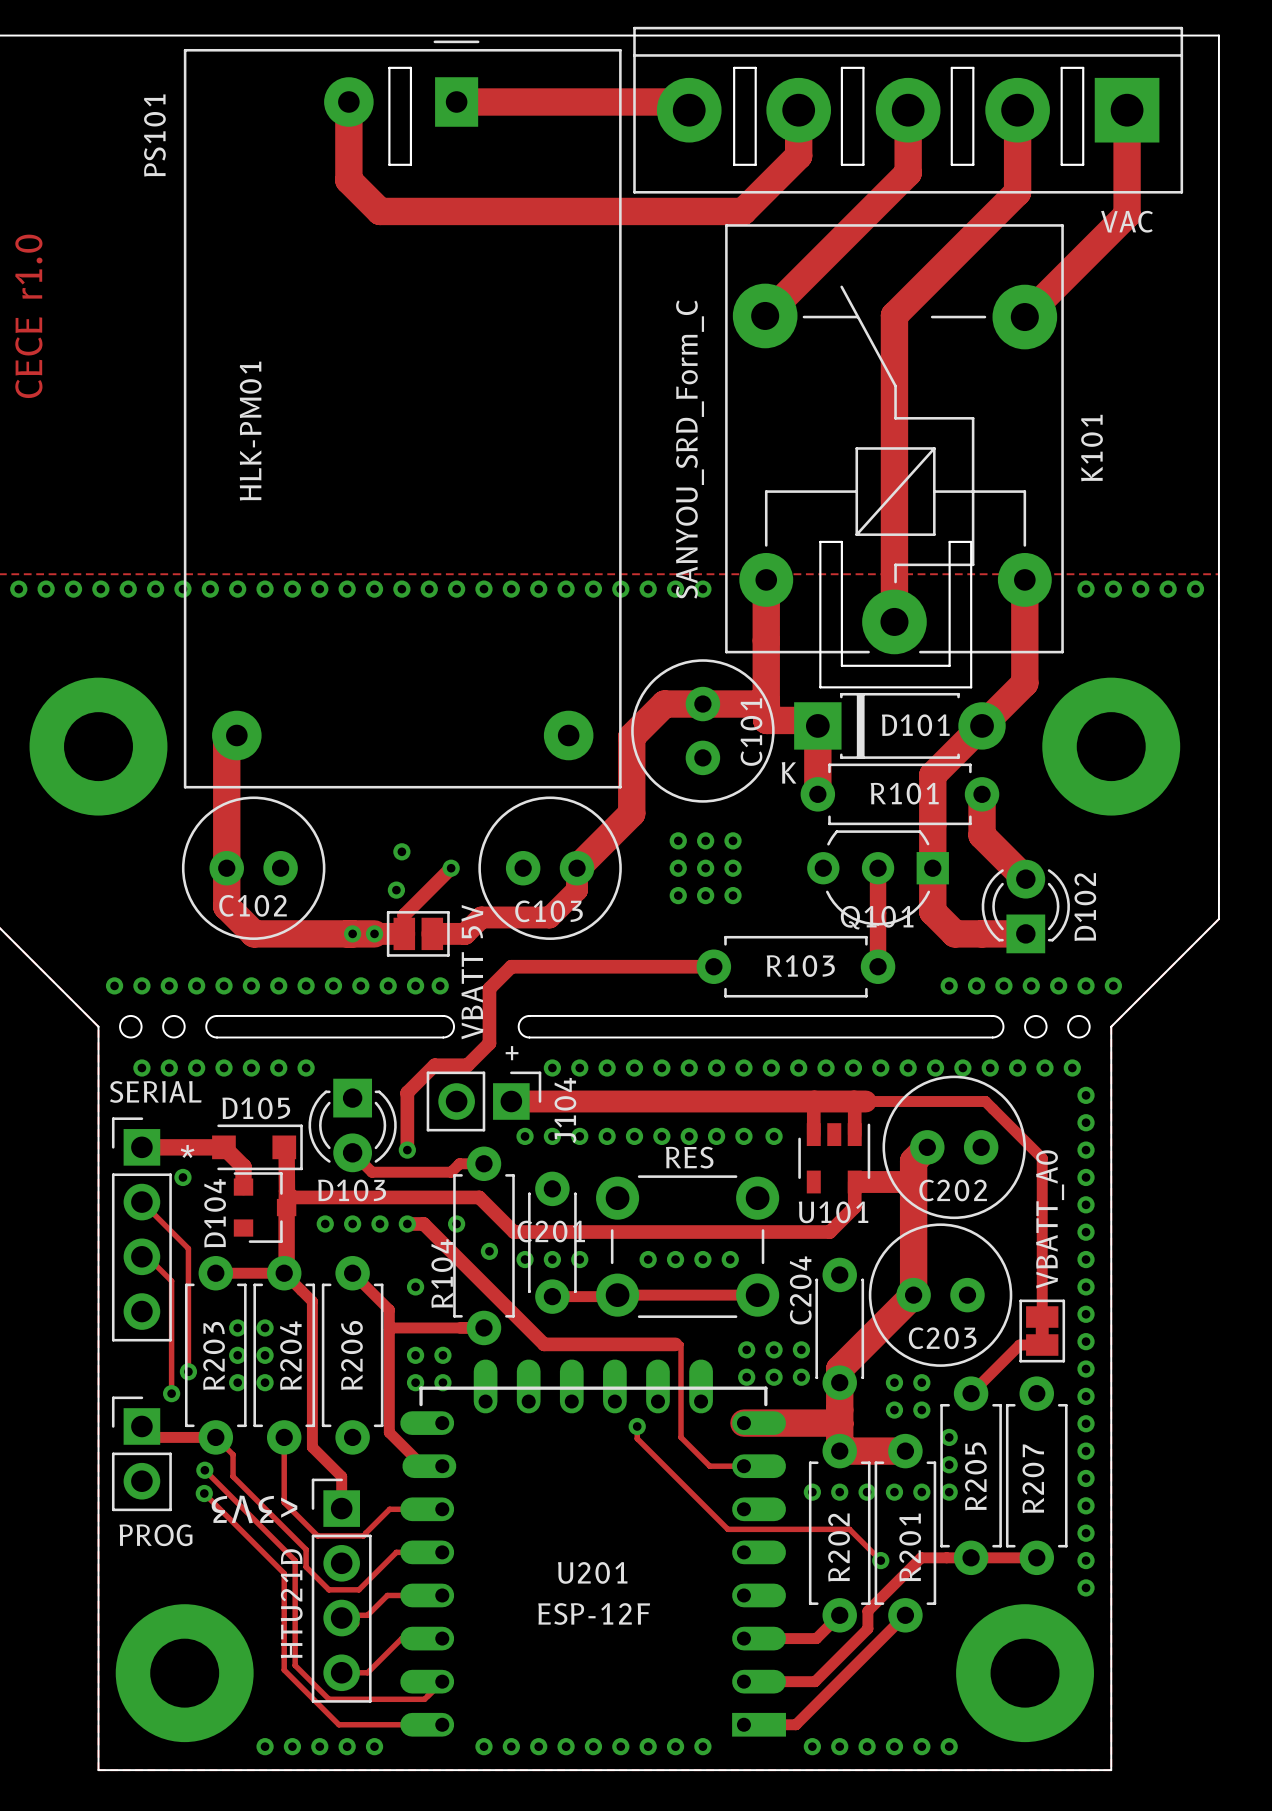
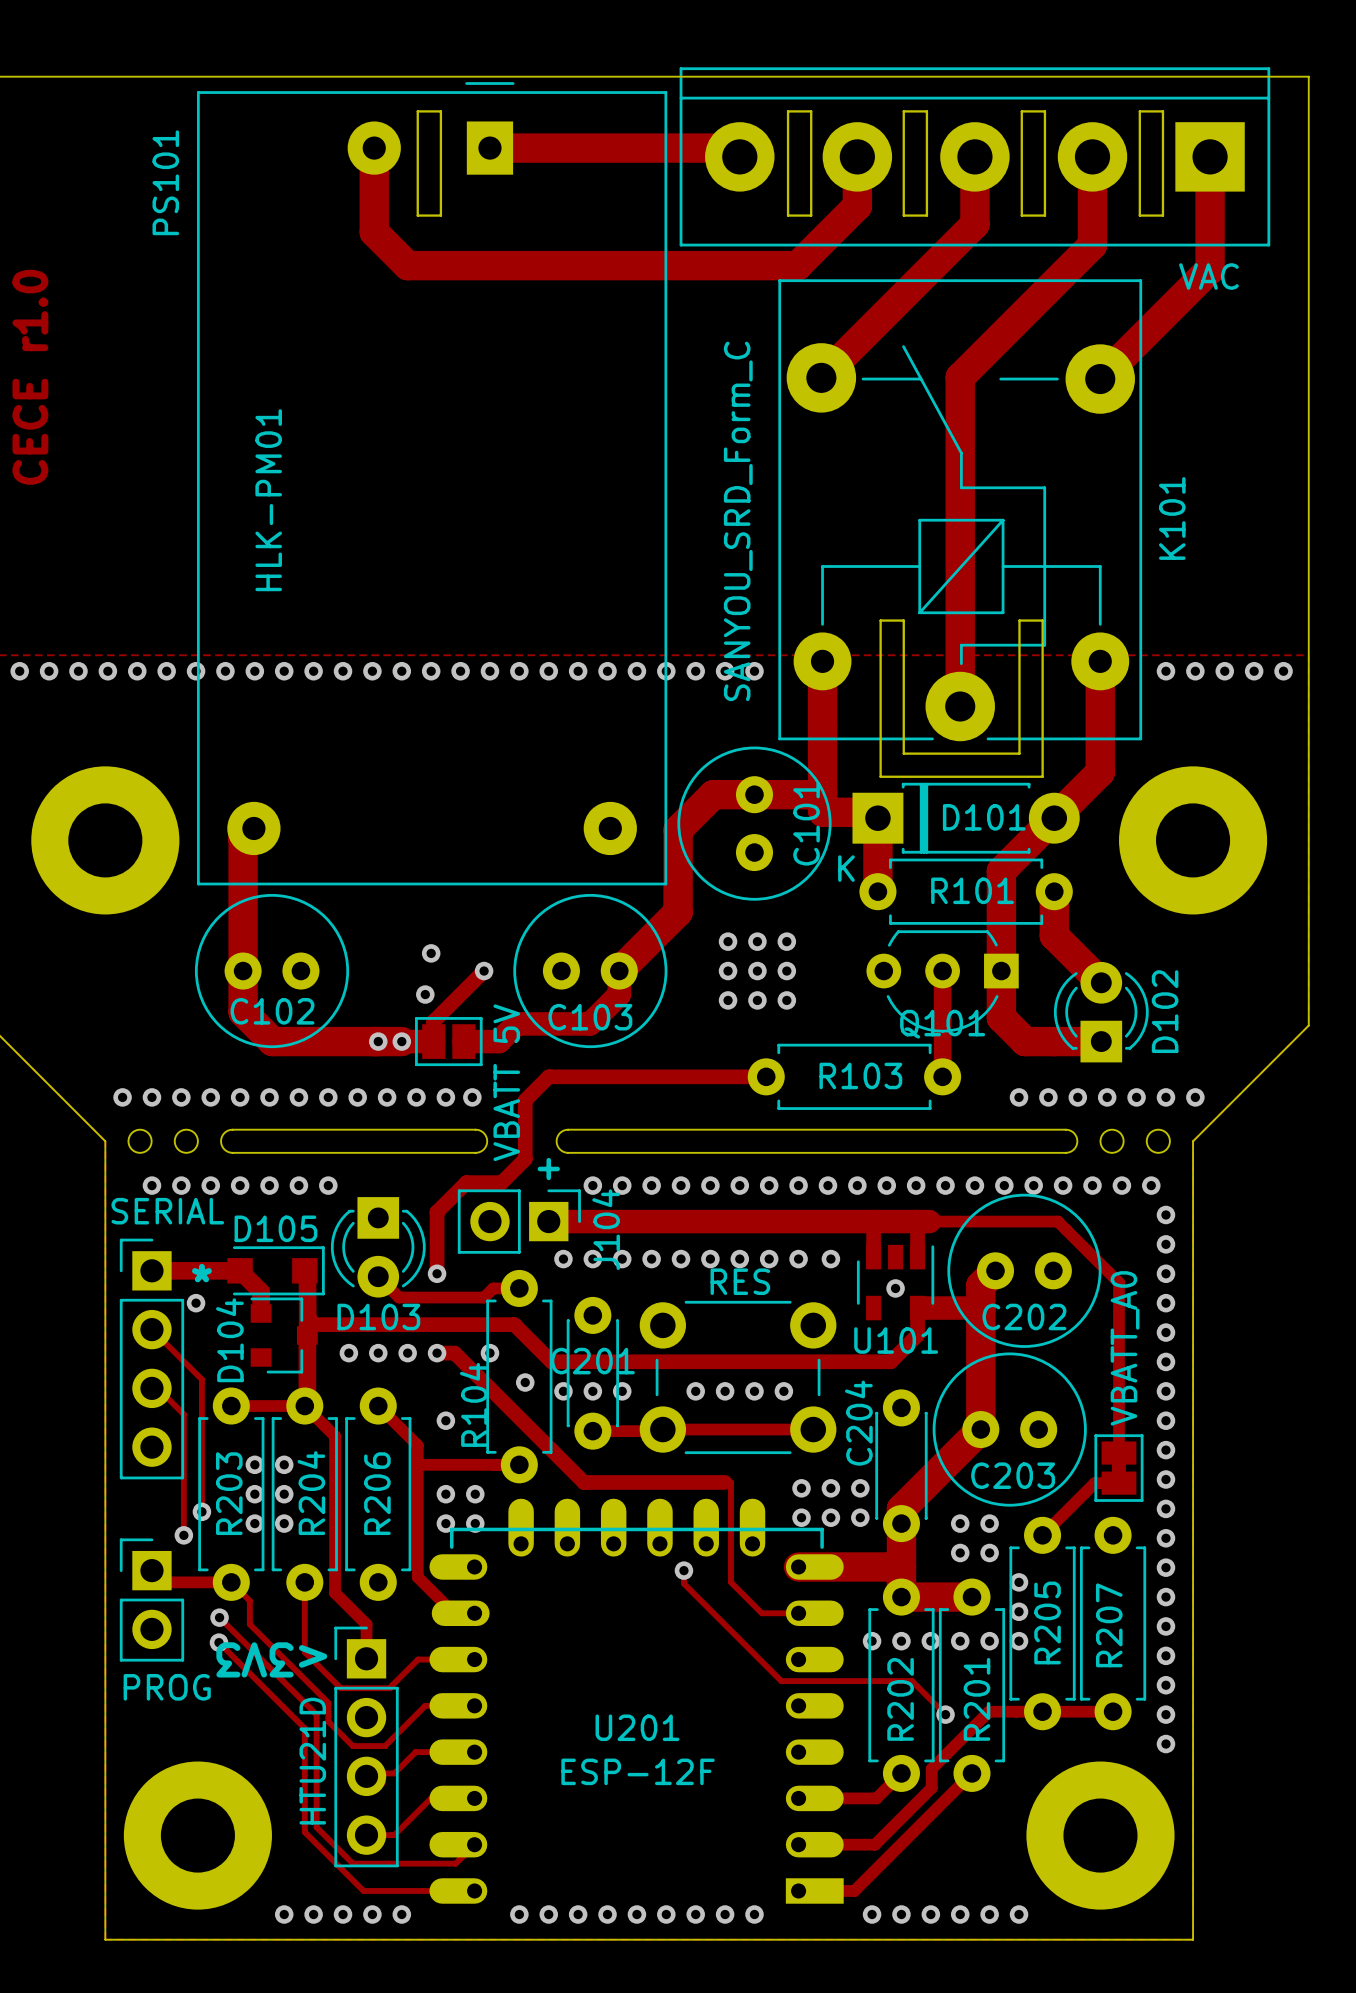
via: none -> (895, 1288)

